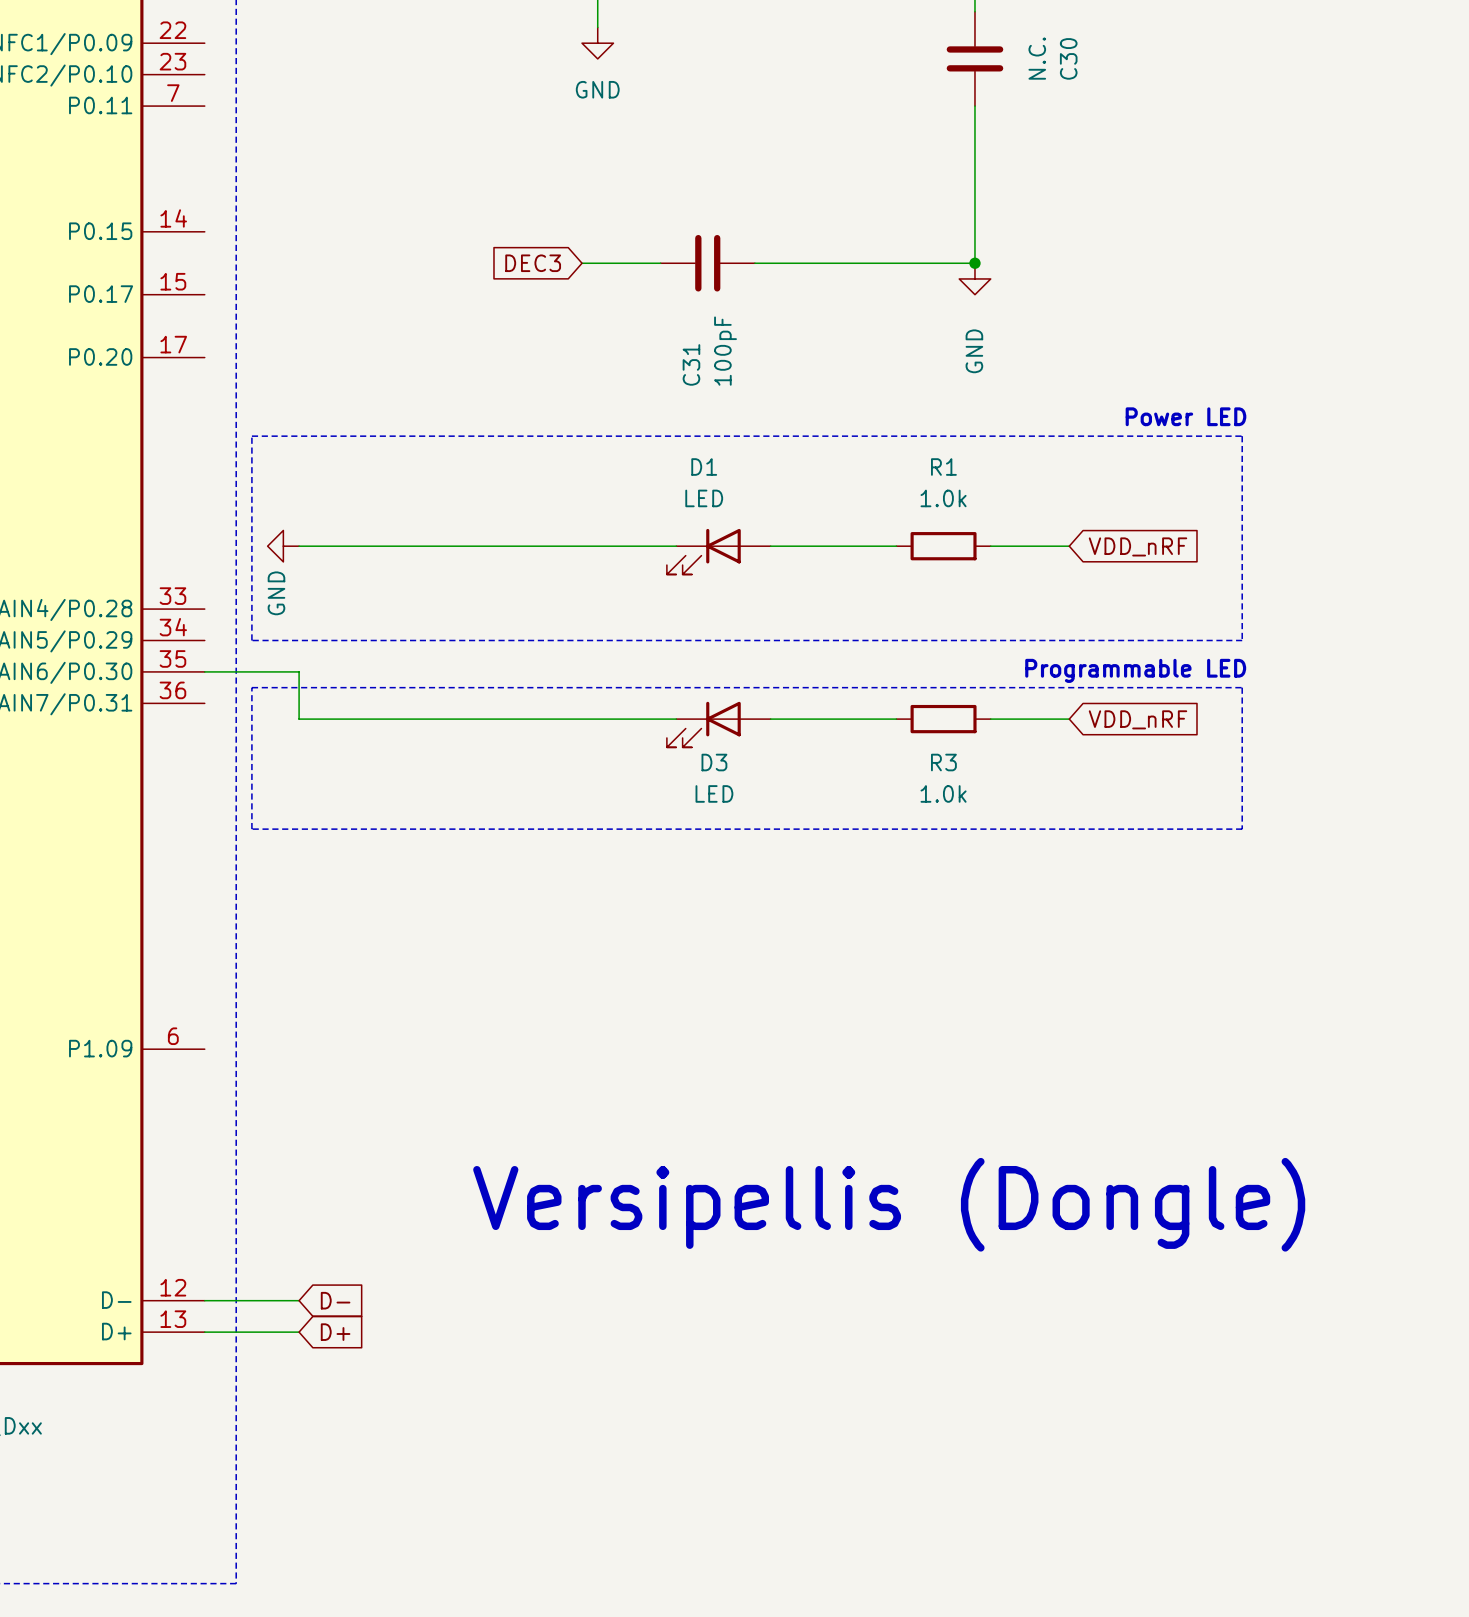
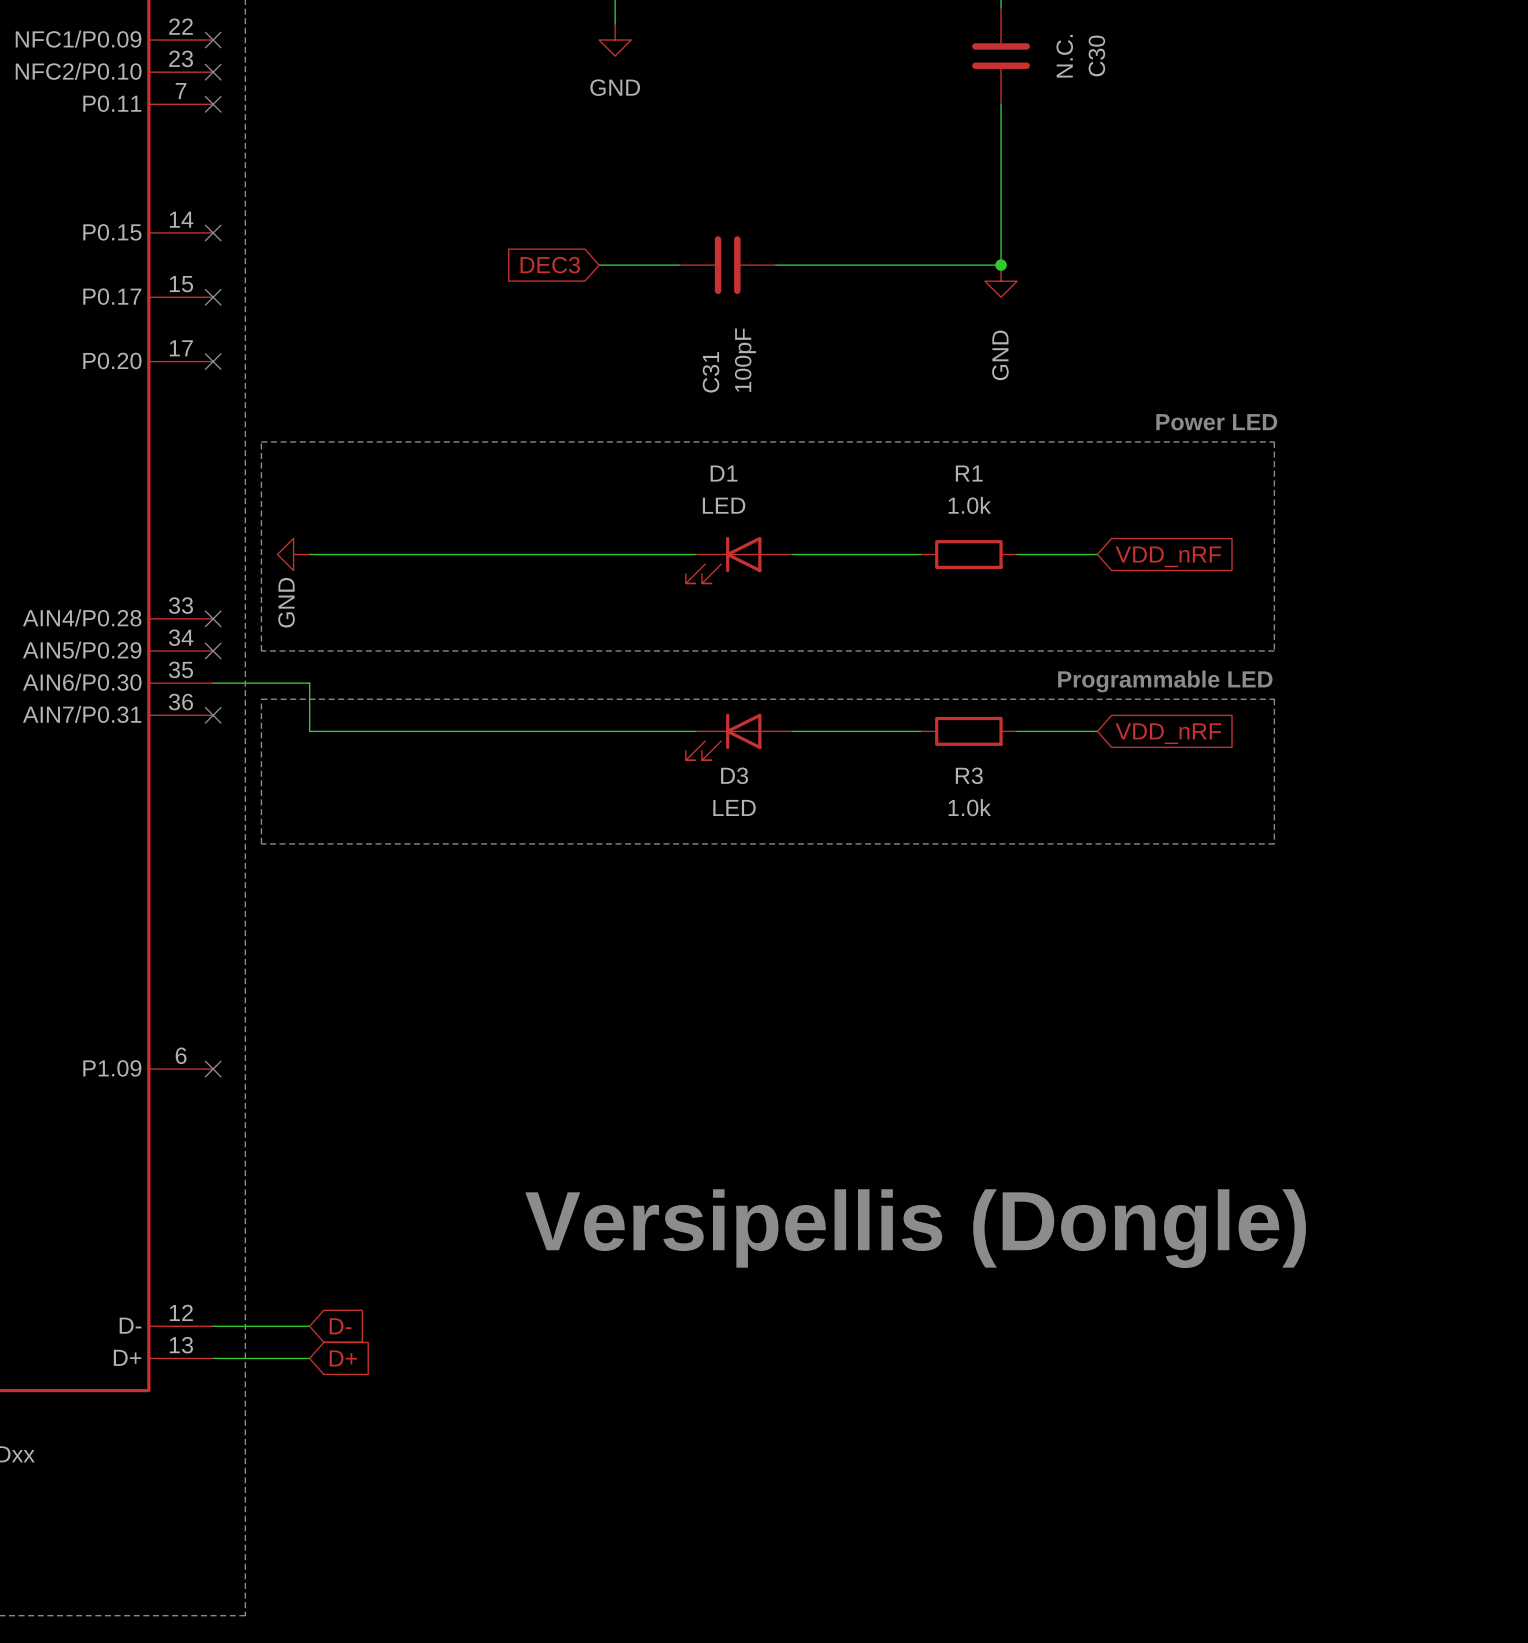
no-connect mark: none -> (213, 40)
no-connect mark: none -> (213, 72)
no-connect mark: none -> (213, 104)
no-connect mark: none -> (213, 232)
no-connect mark: none -> (213, 297)
no-connect mark: none -> (213, 361)
no-connect mark: none -> (213, 618)
no-connect mark: none -> (213, 650)
no-connect mark: none -> (213, 715)
no-connect mark: none -> (213, 1069)

